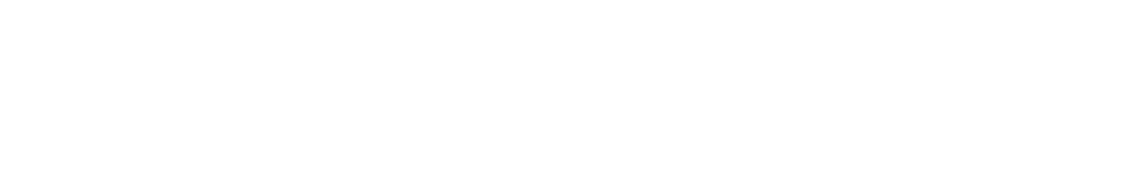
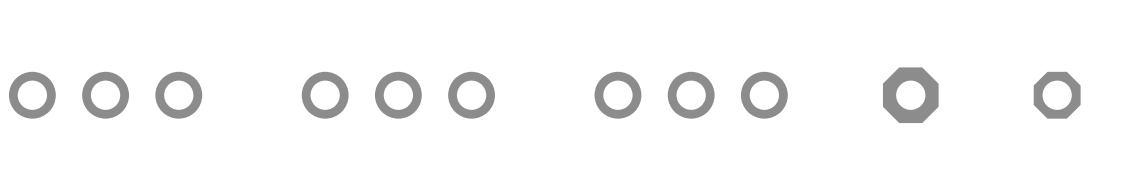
part: none -> (105, 95)
part: none -> (398, 95)
part: none -> (691, 95)
part: none -> (910, 95)
part: none -> (1057, 95)

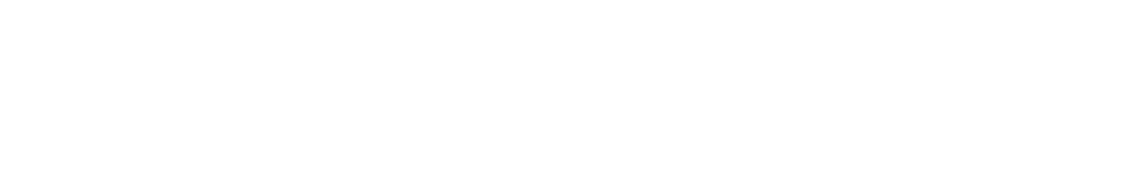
part: (105, 95) -> none
part: (398, 95) -> none
part: (691, 95) -> none
part: (910, 95) -> none
part: (1057, 95) -> none

